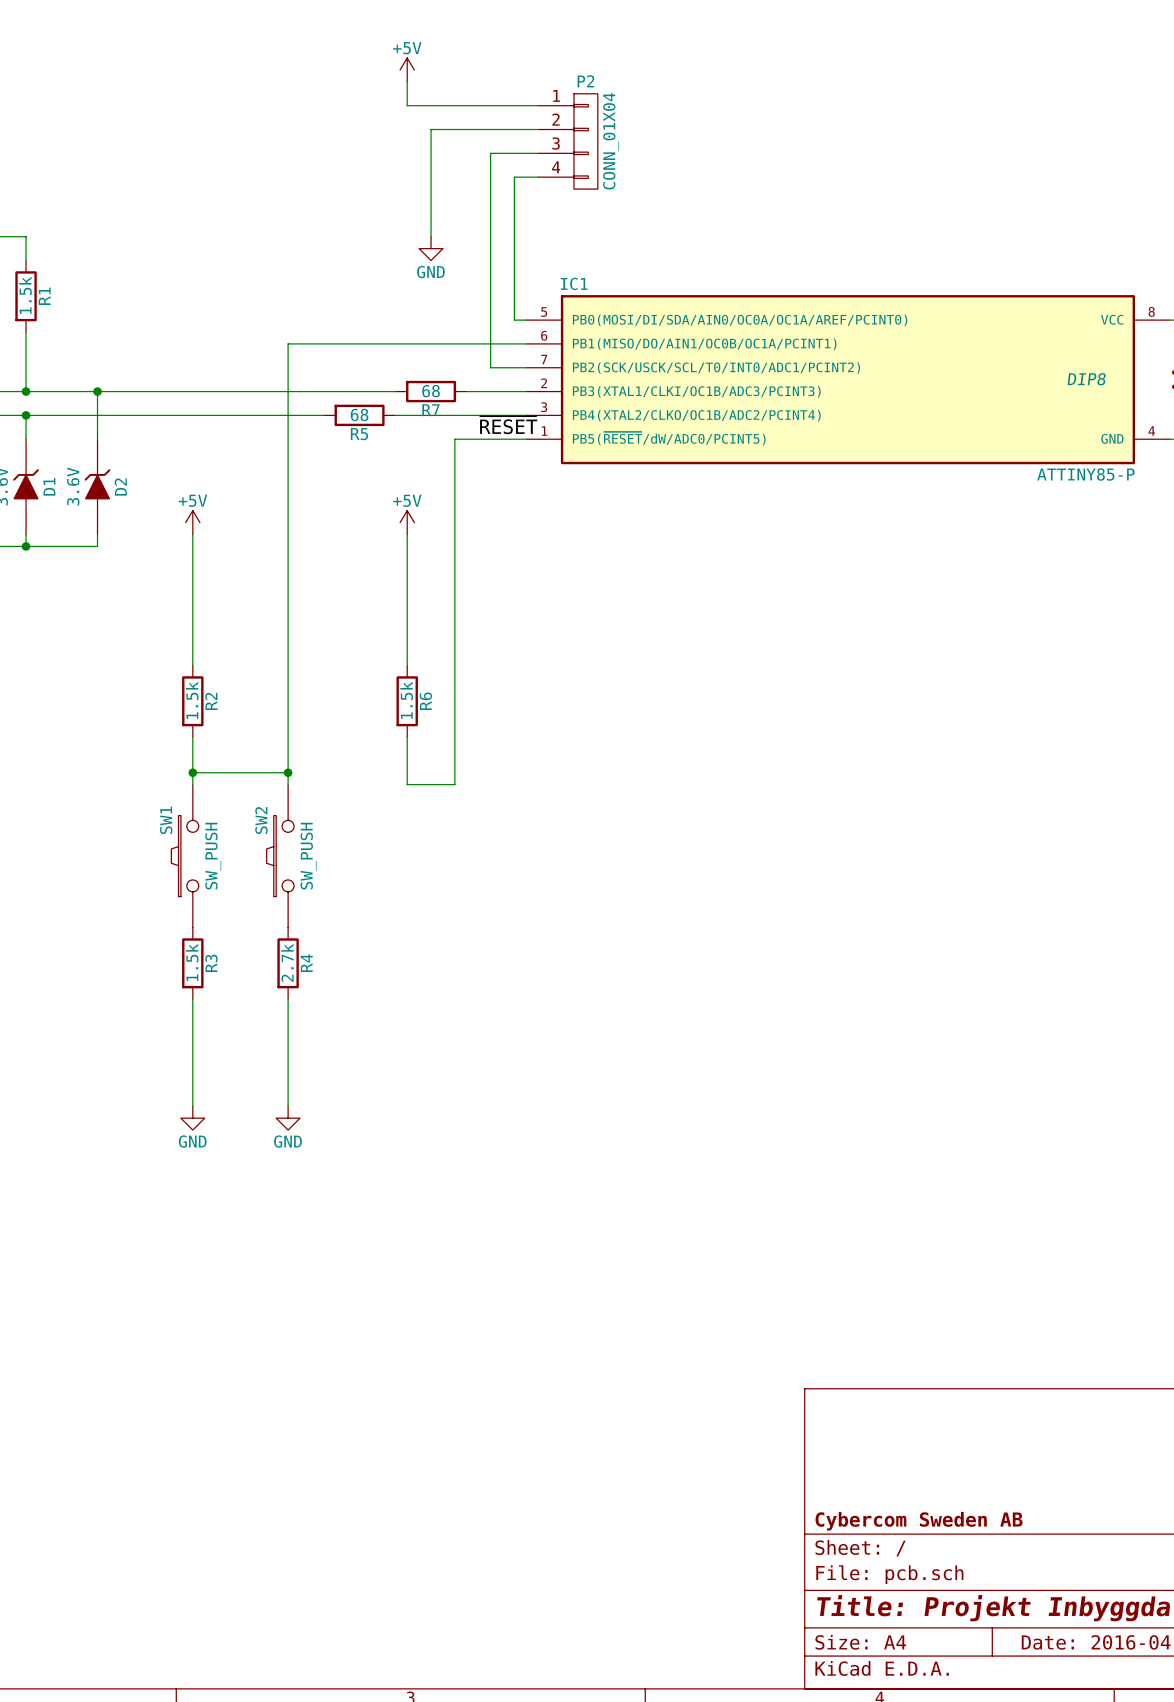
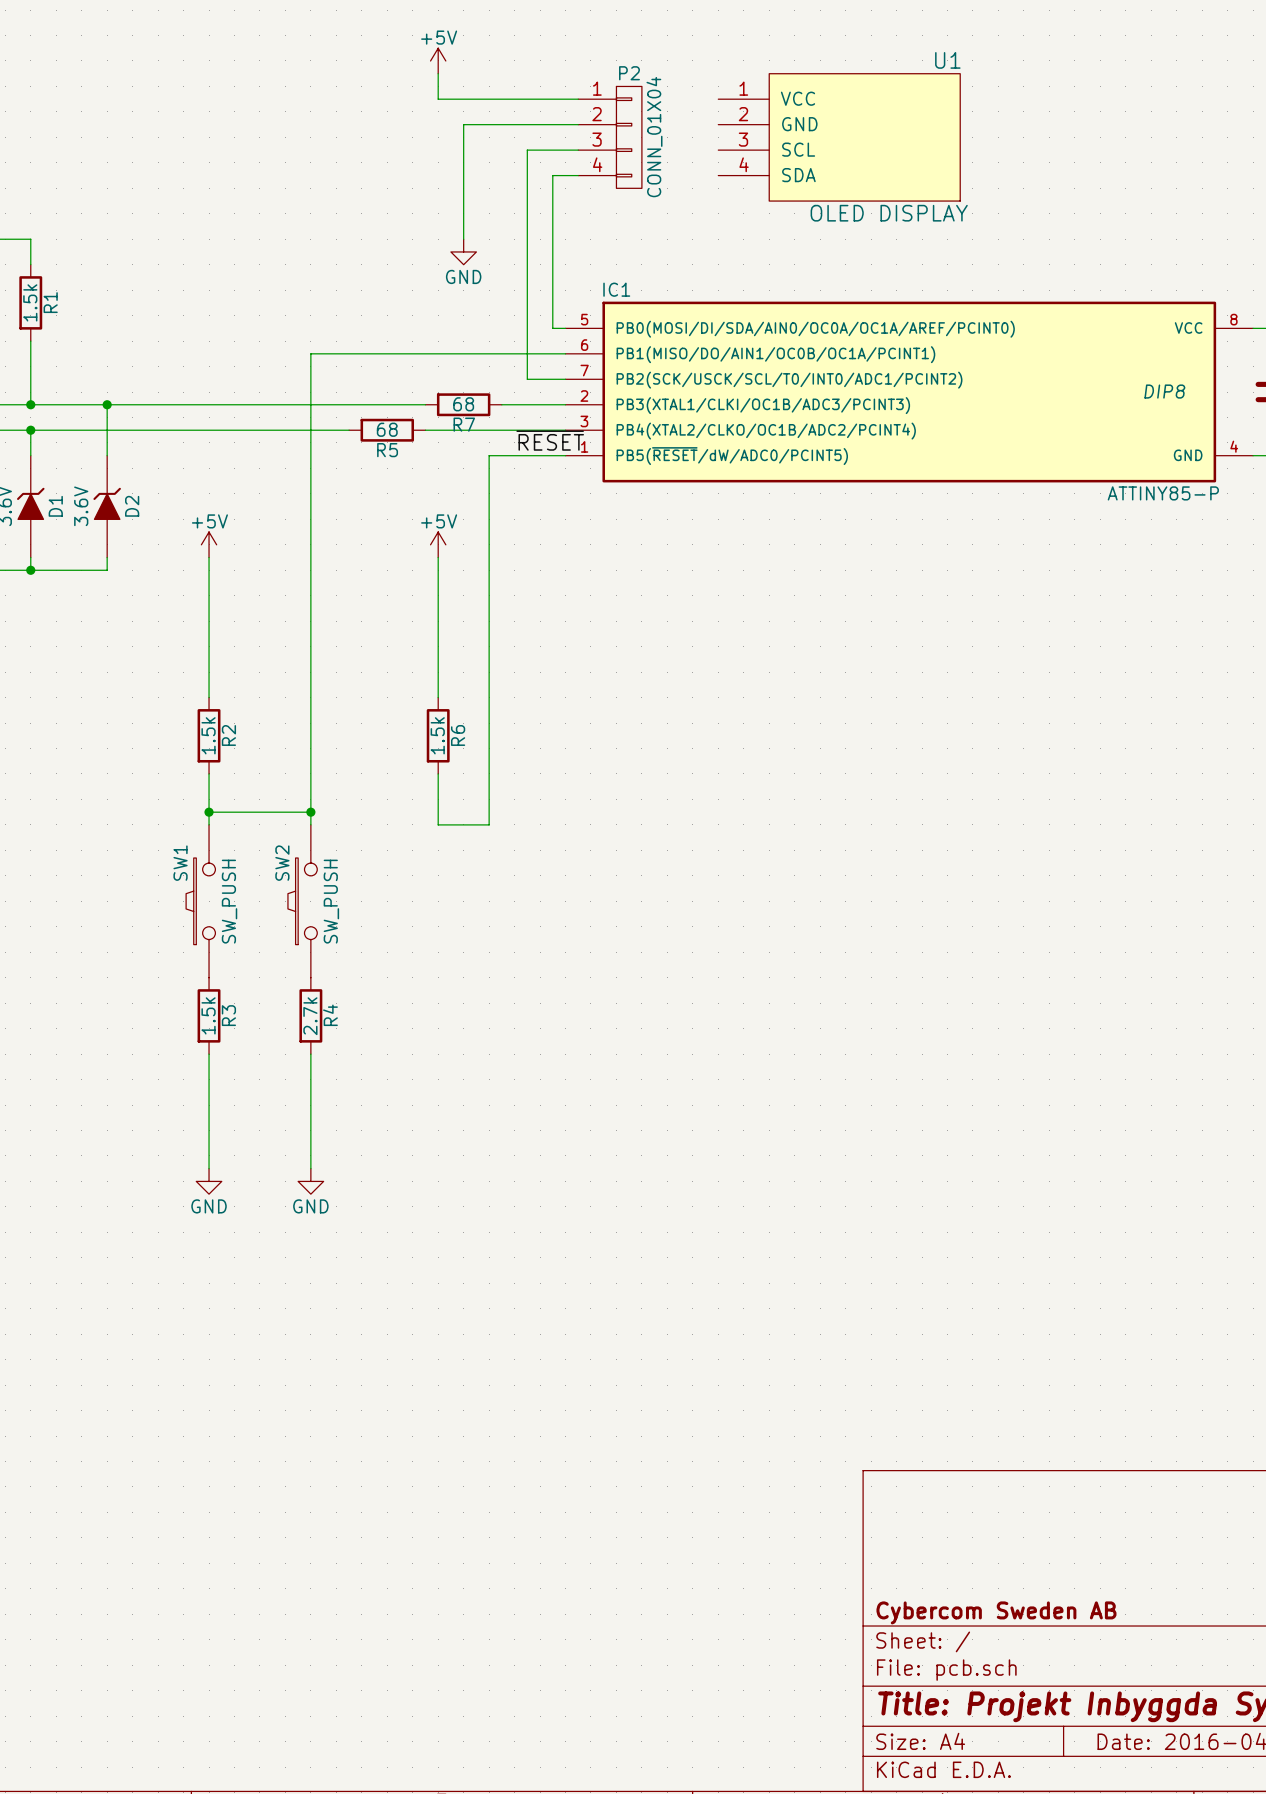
U1: none -> OLED DISPLAY (839, 137)

